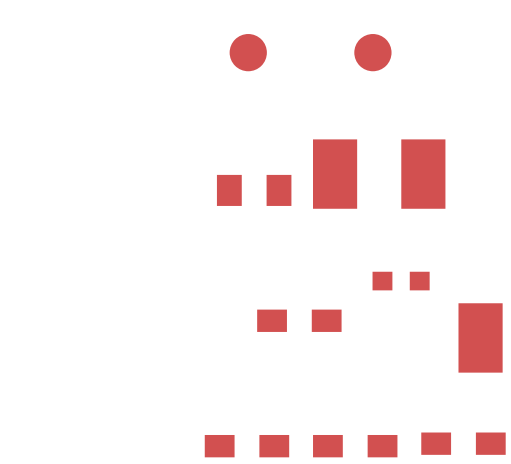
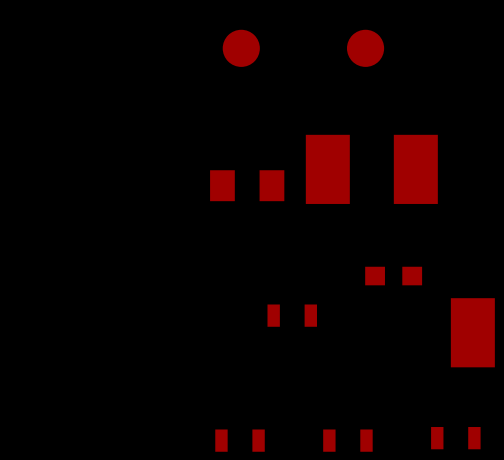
part footprint: [257, 309, 342, 332] -> [267, 304, 317, 327]
part footprint: [421, 432, 506, 455] -> [431, 427, 481, 450]
part footprint: [204, 434, 290, 458] -> [215, 429, 265, 452]
part footprint: [313, 434, 398, 458] -> [323, 429, 373, 452]

